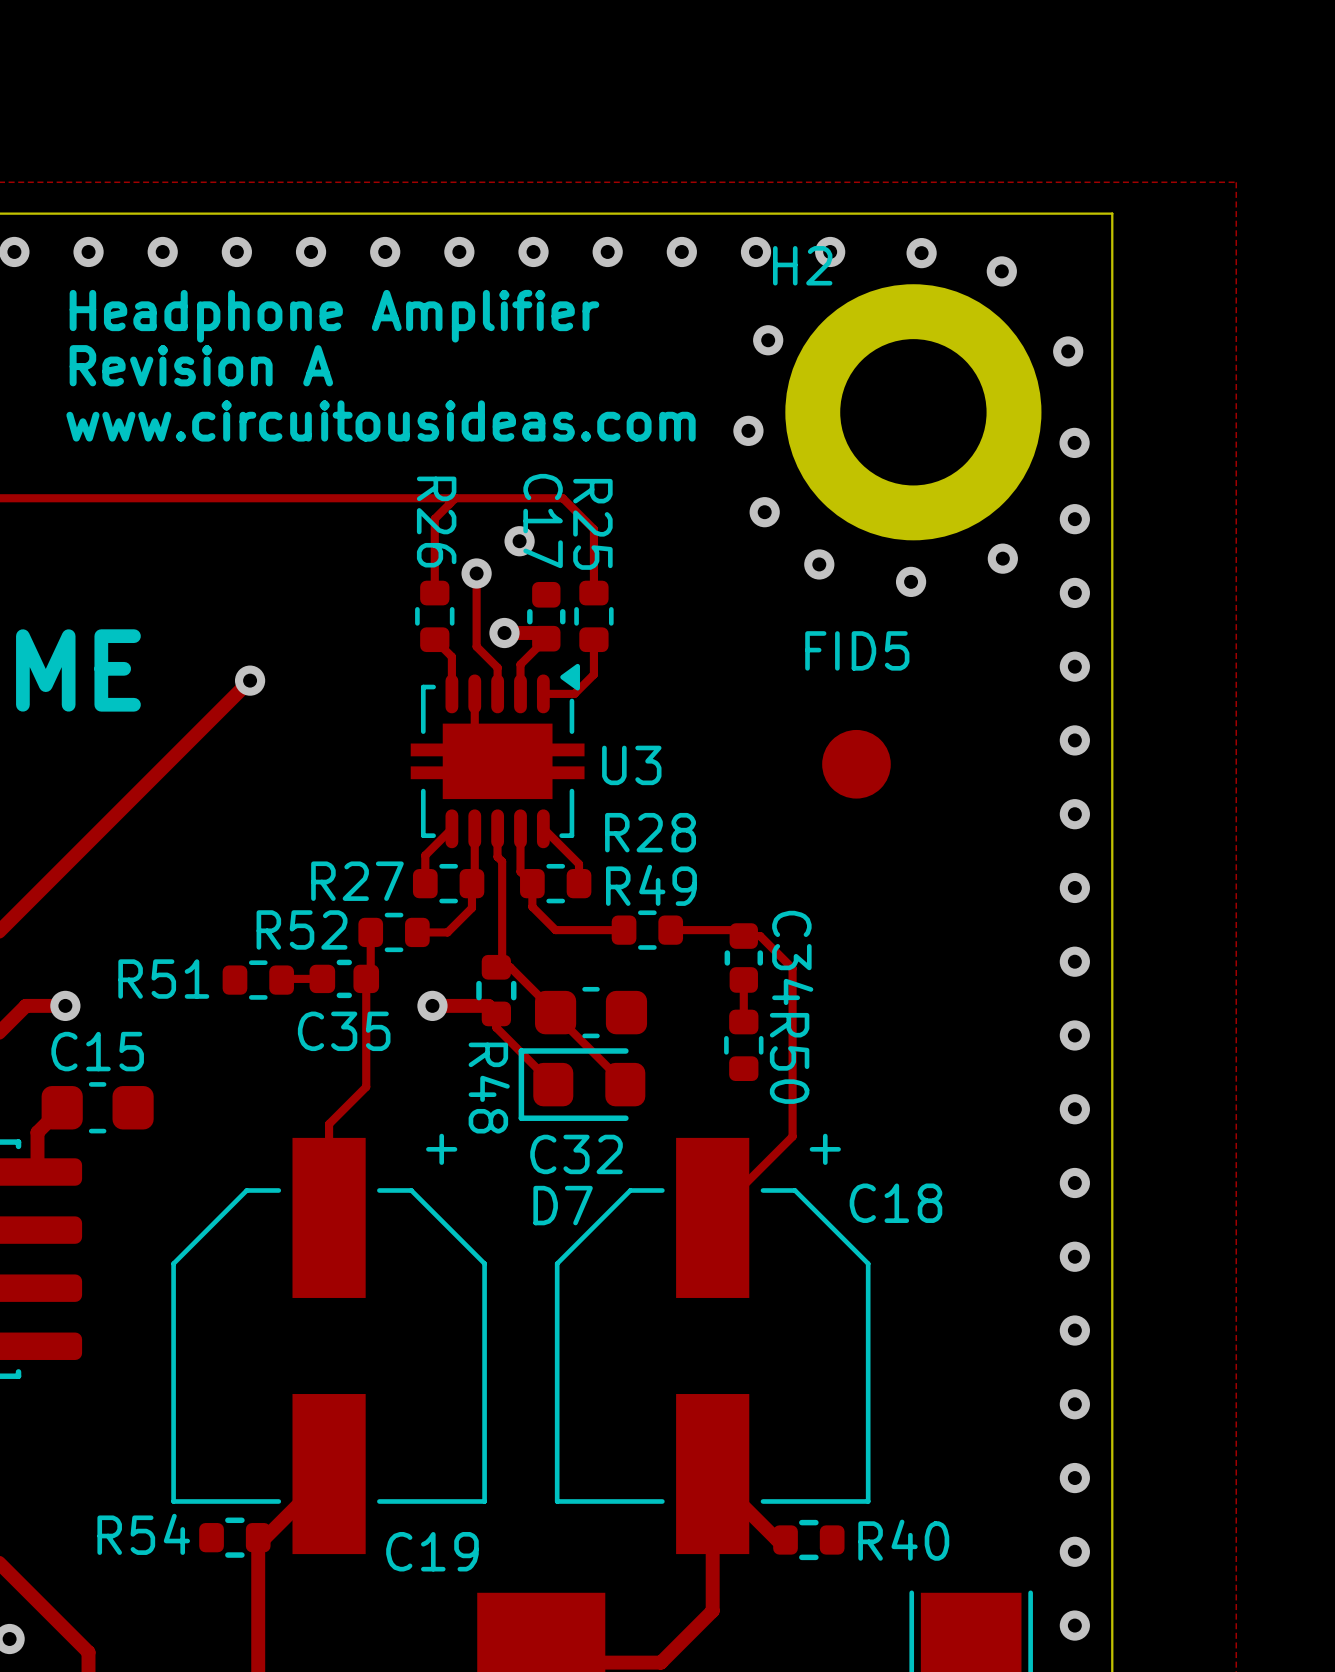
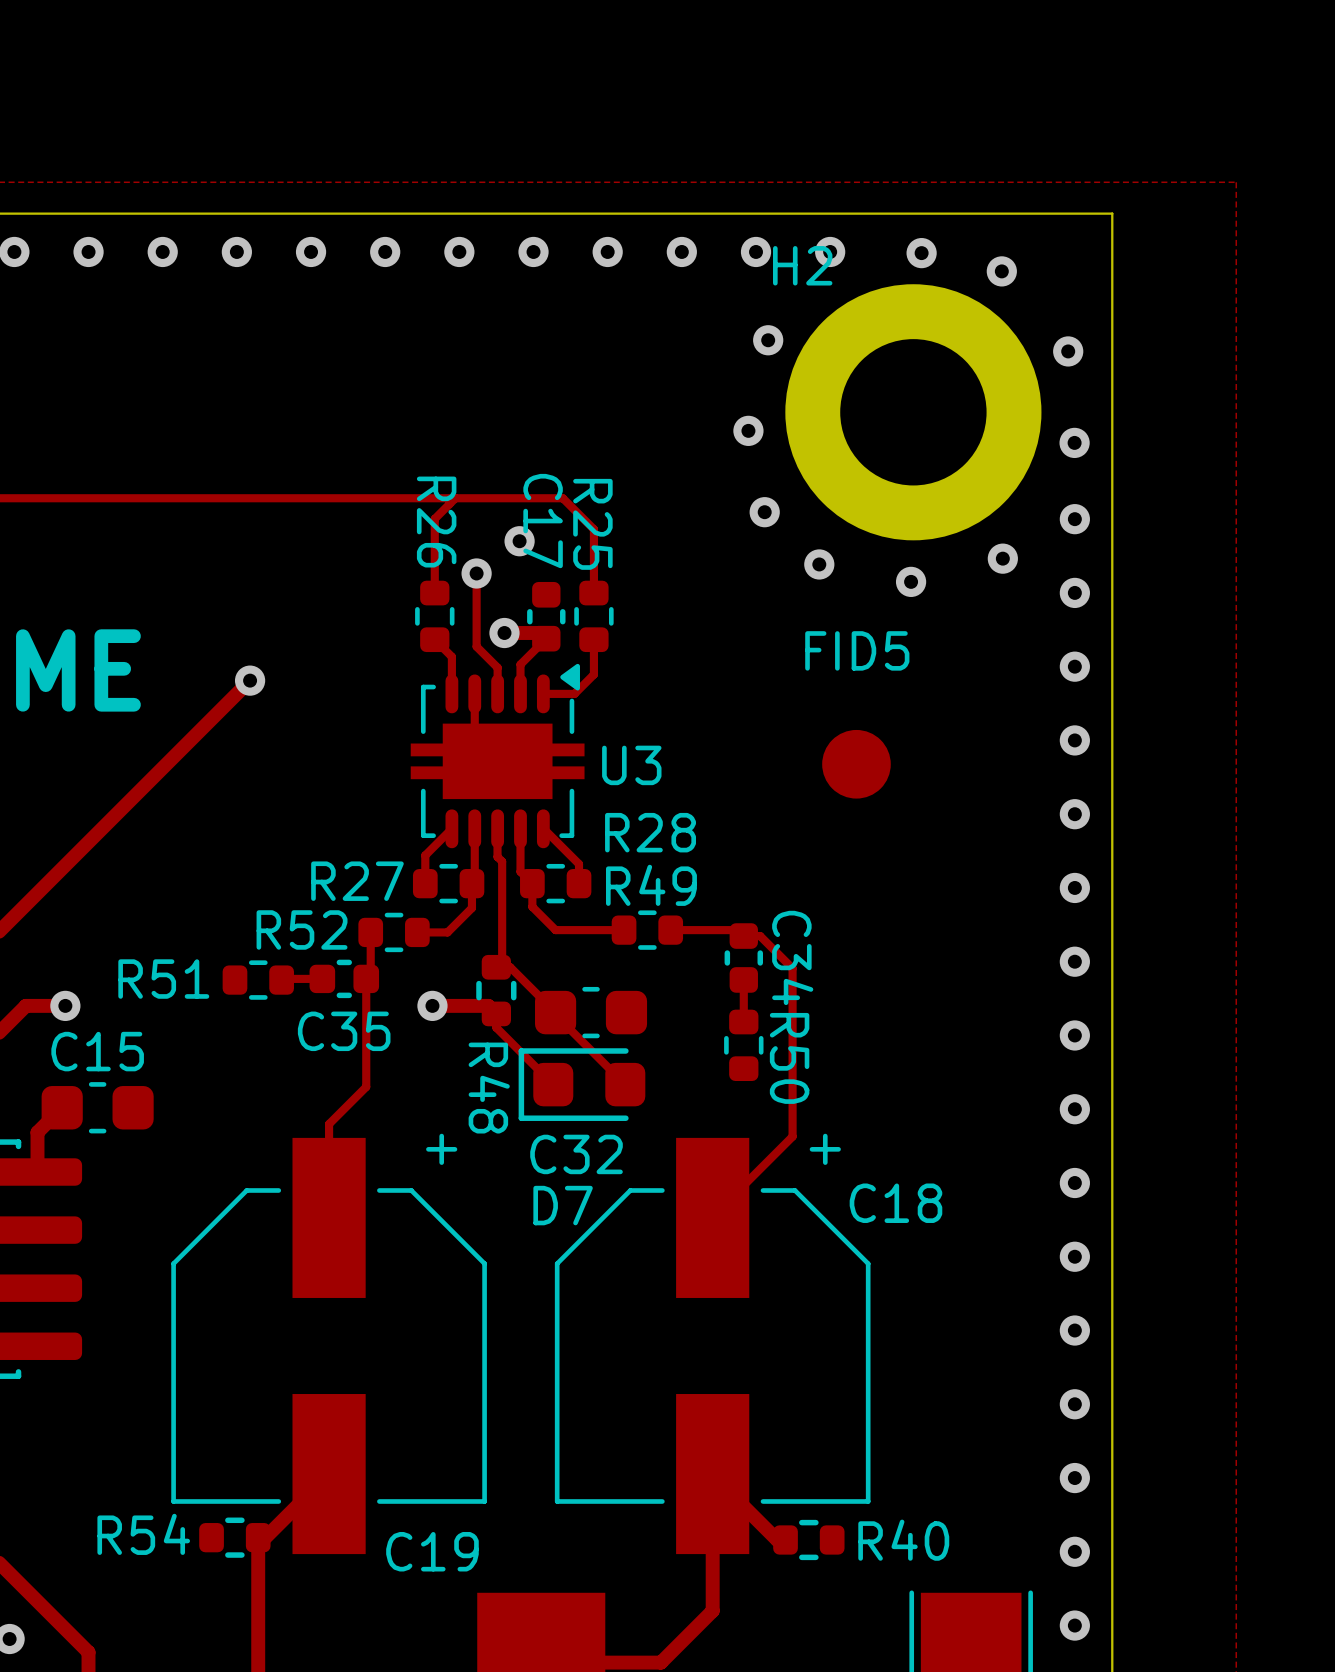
text: Headphone Amplifier (334, 316) -> none
text: Revision A (201, 365) -> none
text: www.circuitousideas.com (381, 420) -> none

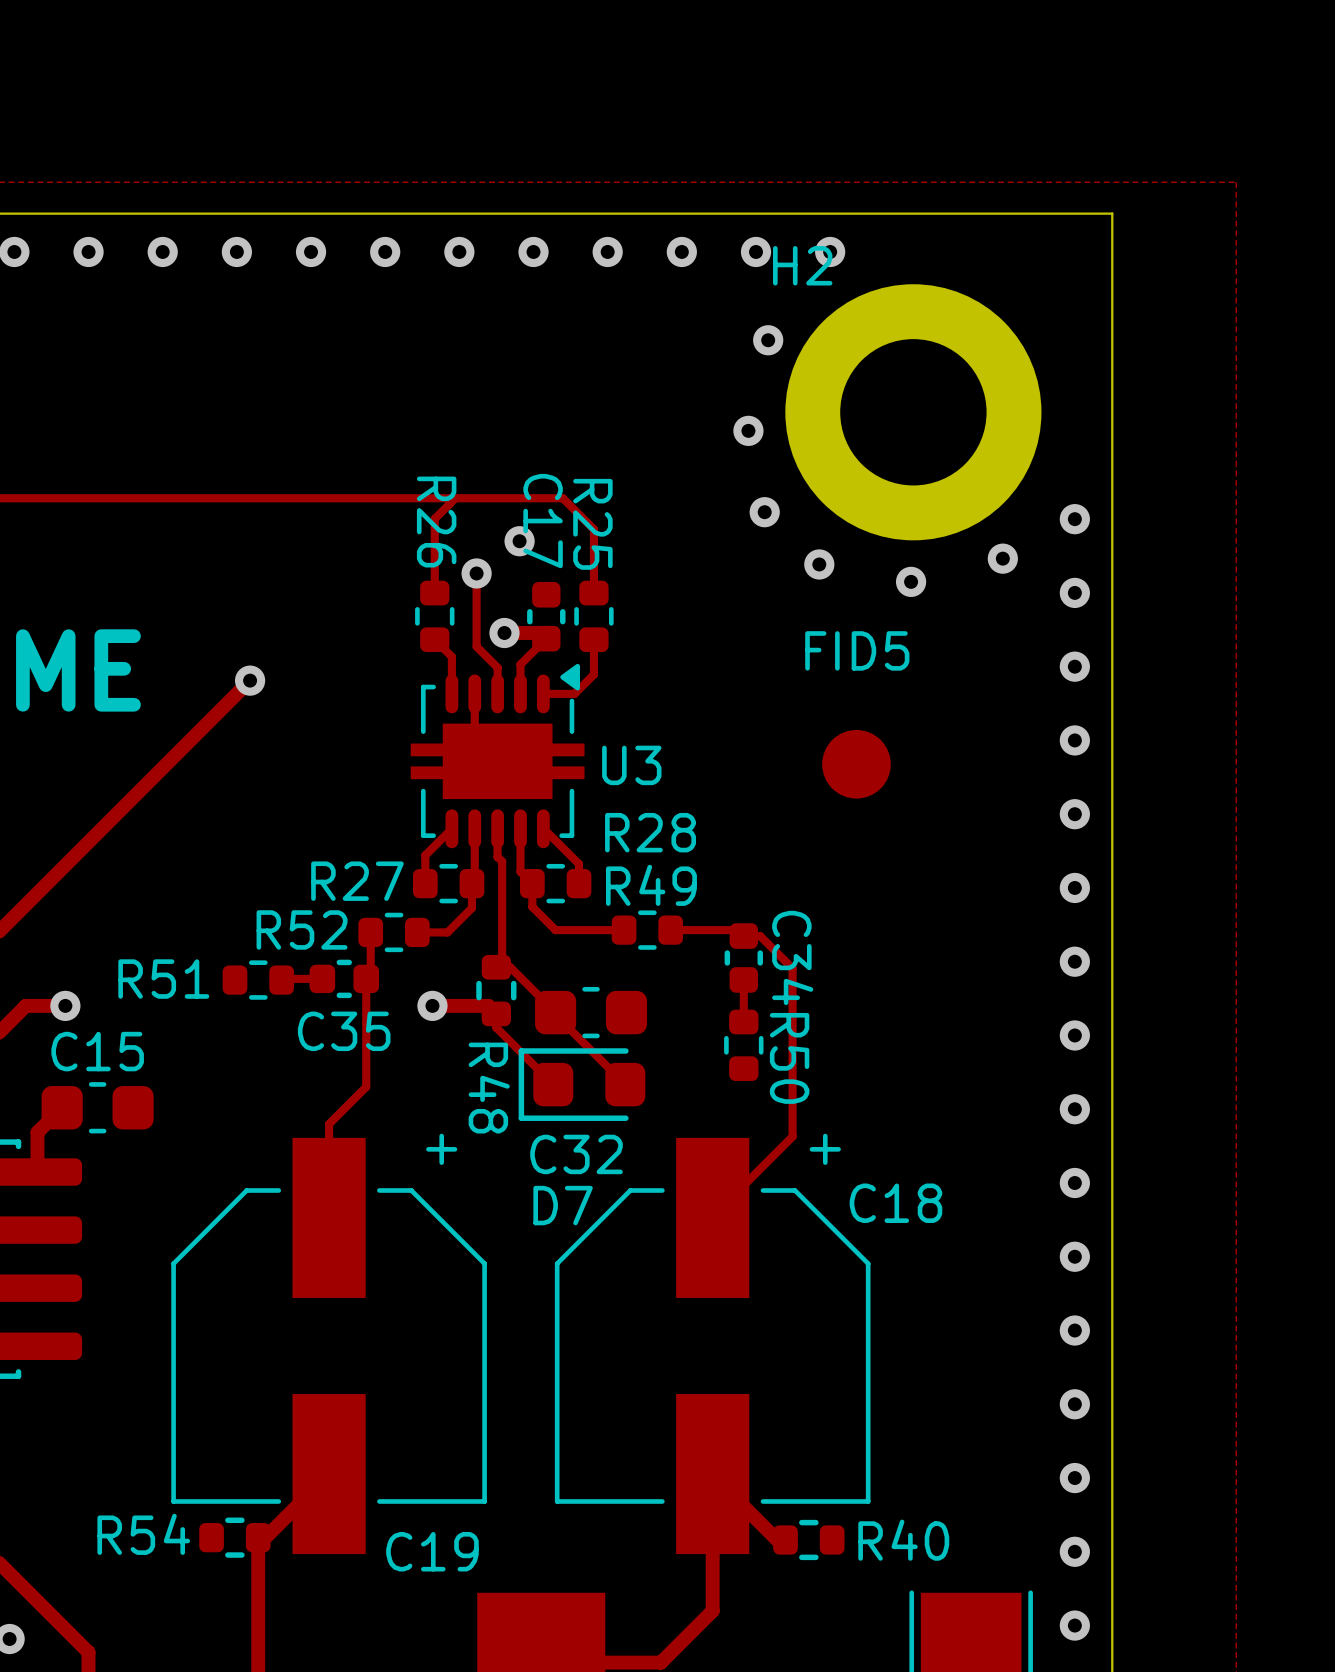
via: (921, 253) -> none
via: (1001, 271) -> none
via: (1068, 351) -> none
via: (1074, 442) -> none

